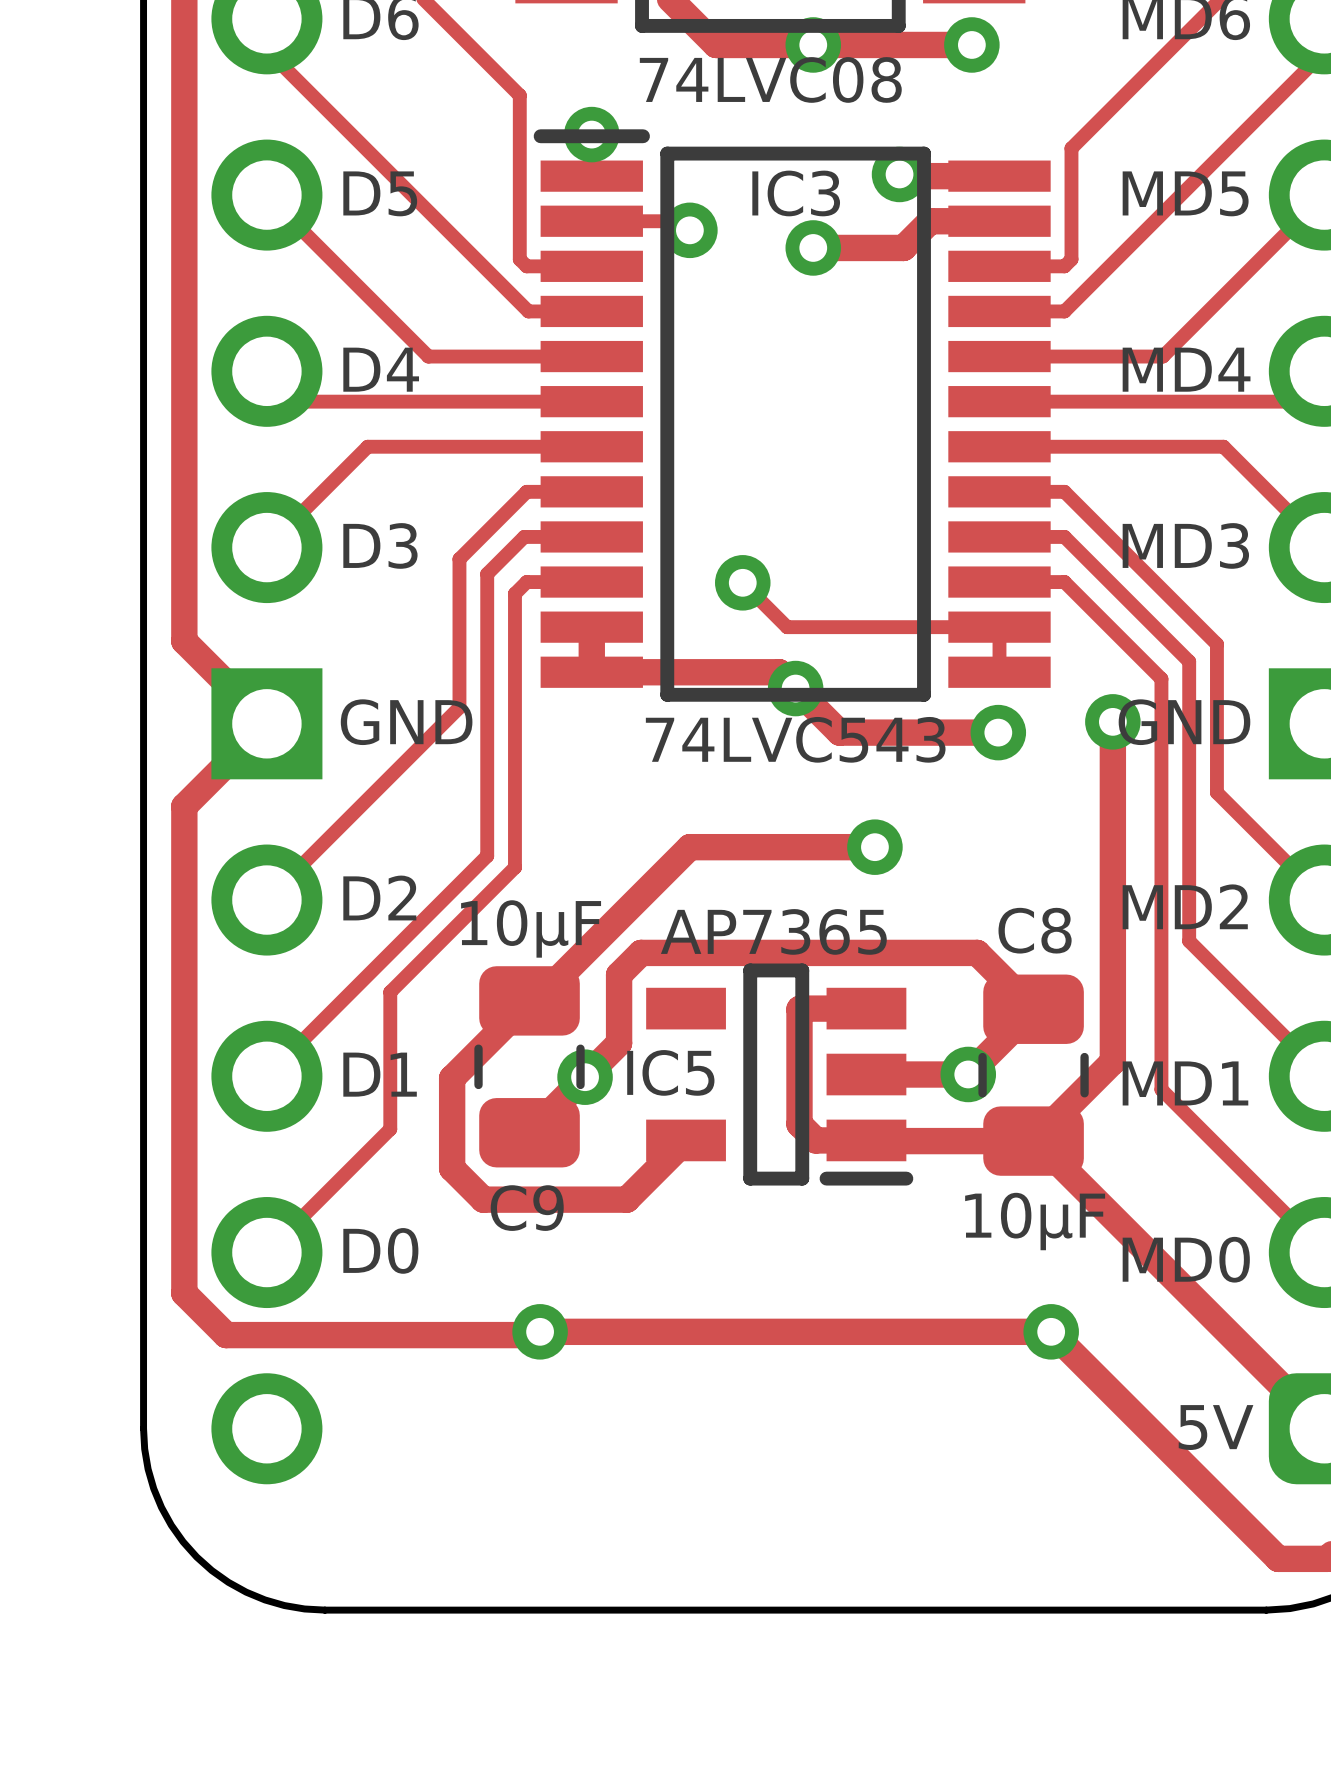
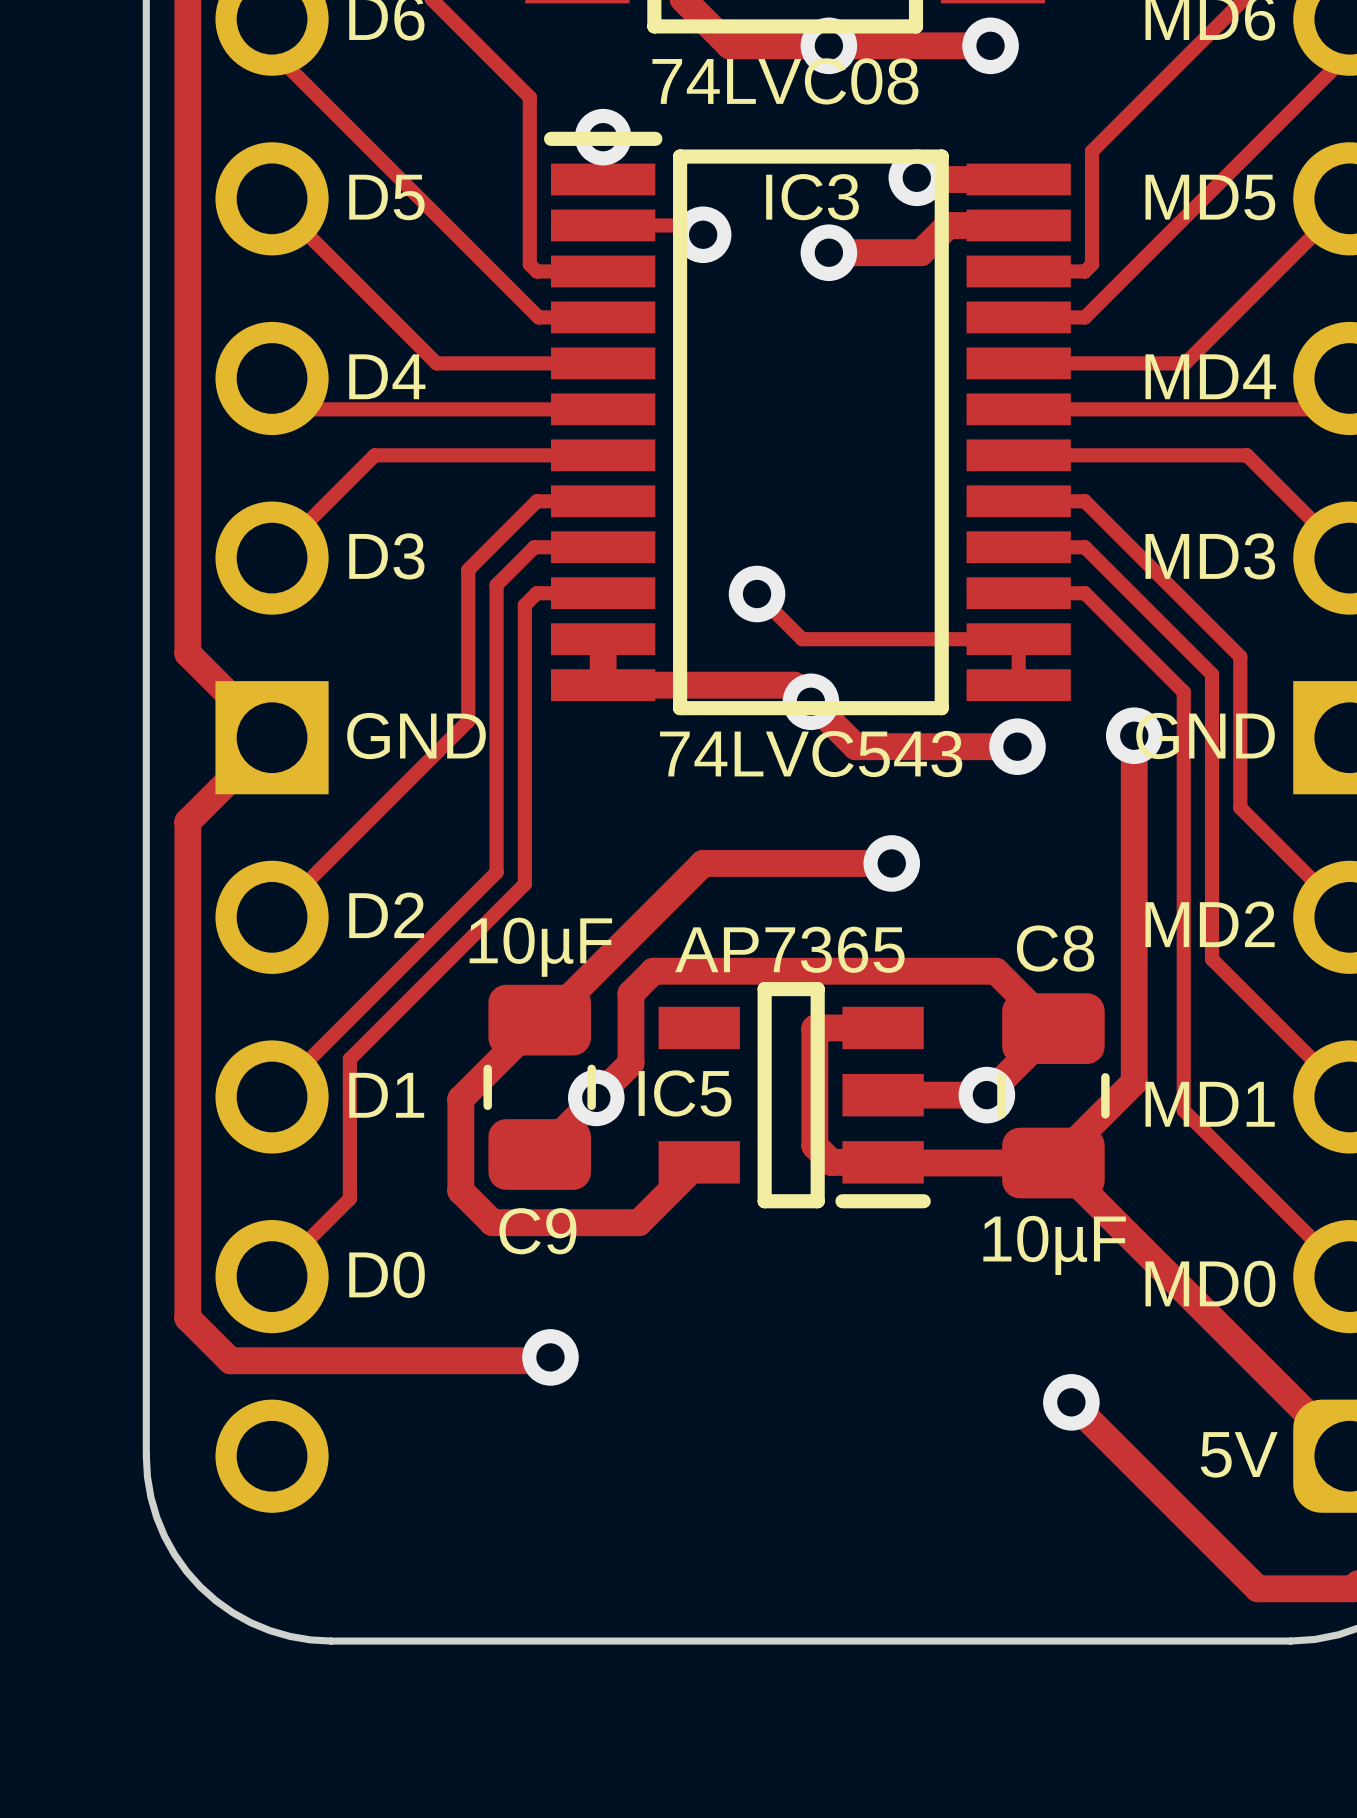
track: (390, 992) (390, 1129) (343, 1176) -> (397, 1011) (349, 1059) (349, 1198)
track: (540, 1331) (1051, 1331) (1278, 1558) -> (1071, 1402) (1257, 1588) (1302, 1588)
via position: (1051, 1331) -> (1071, 1402)

